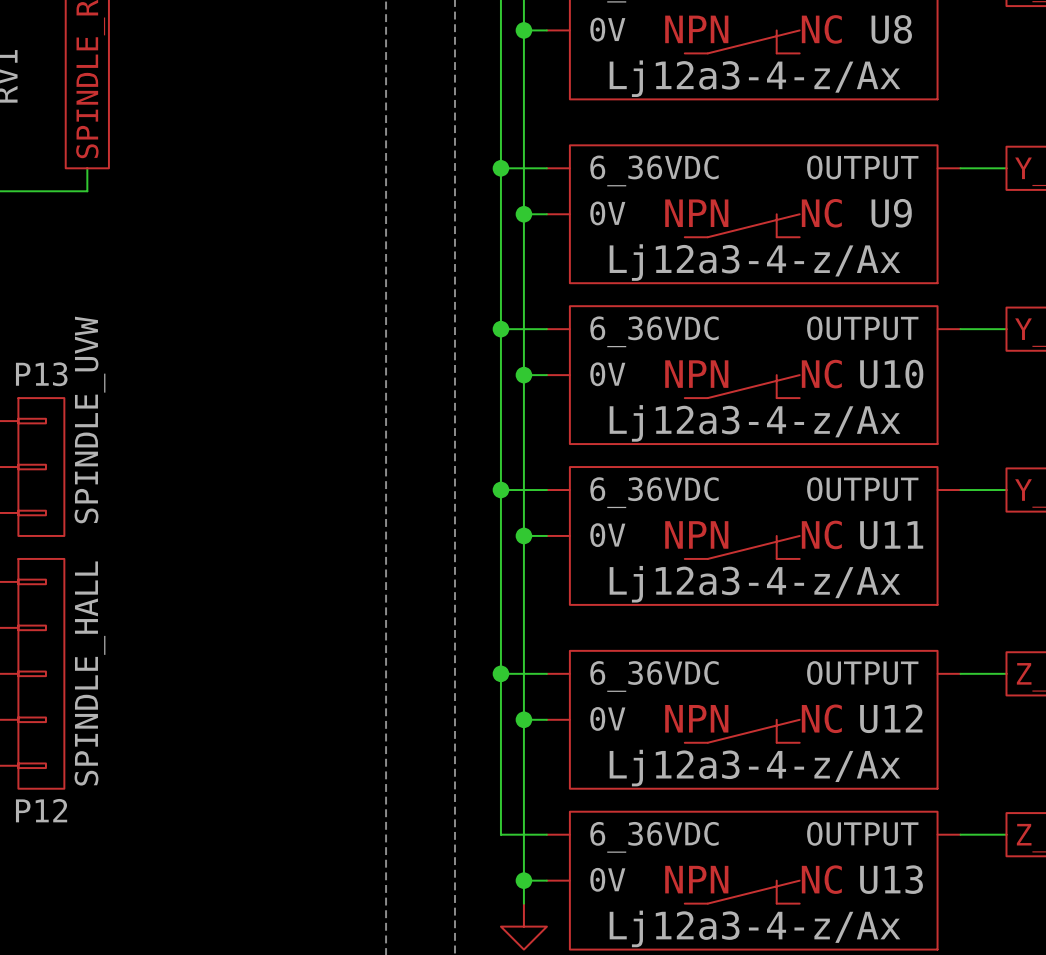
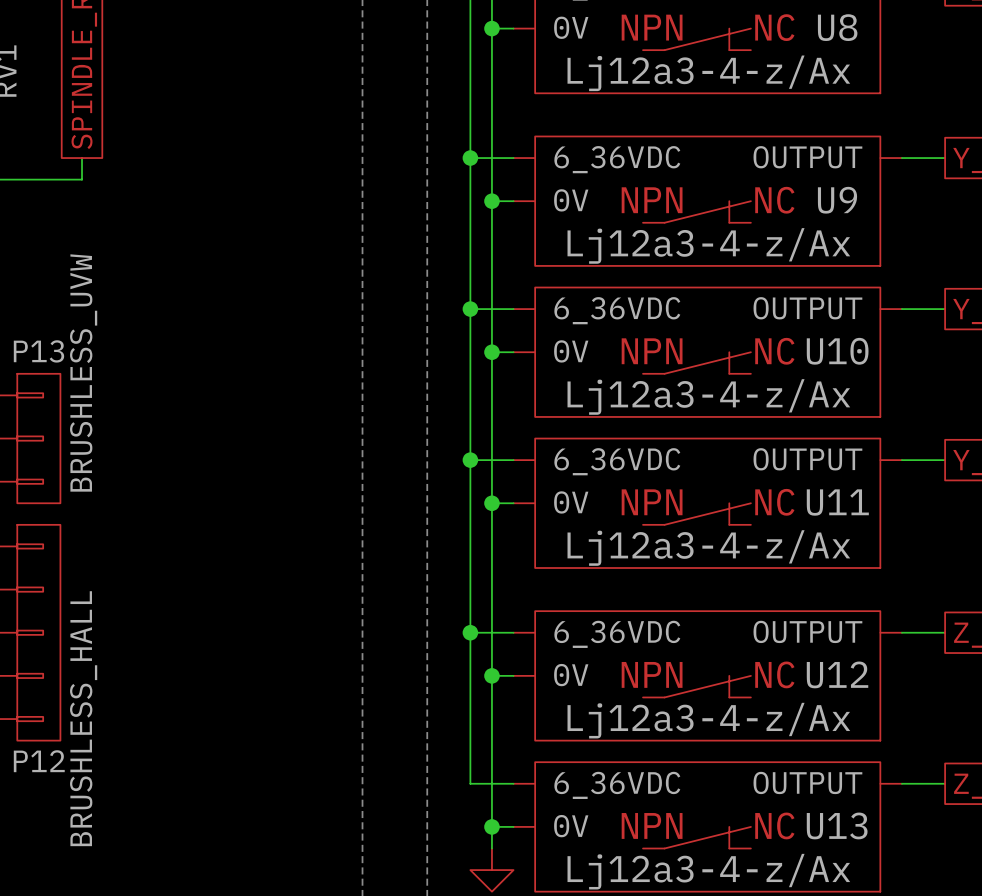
P13 value: SPINDLE_UVW (89, 420) -> BRUSHLESS_UVW (83, 372)
P12 value: SPINDLE_HALL (89, 673) -> BRUSHLESS_HALL (83, 718)

